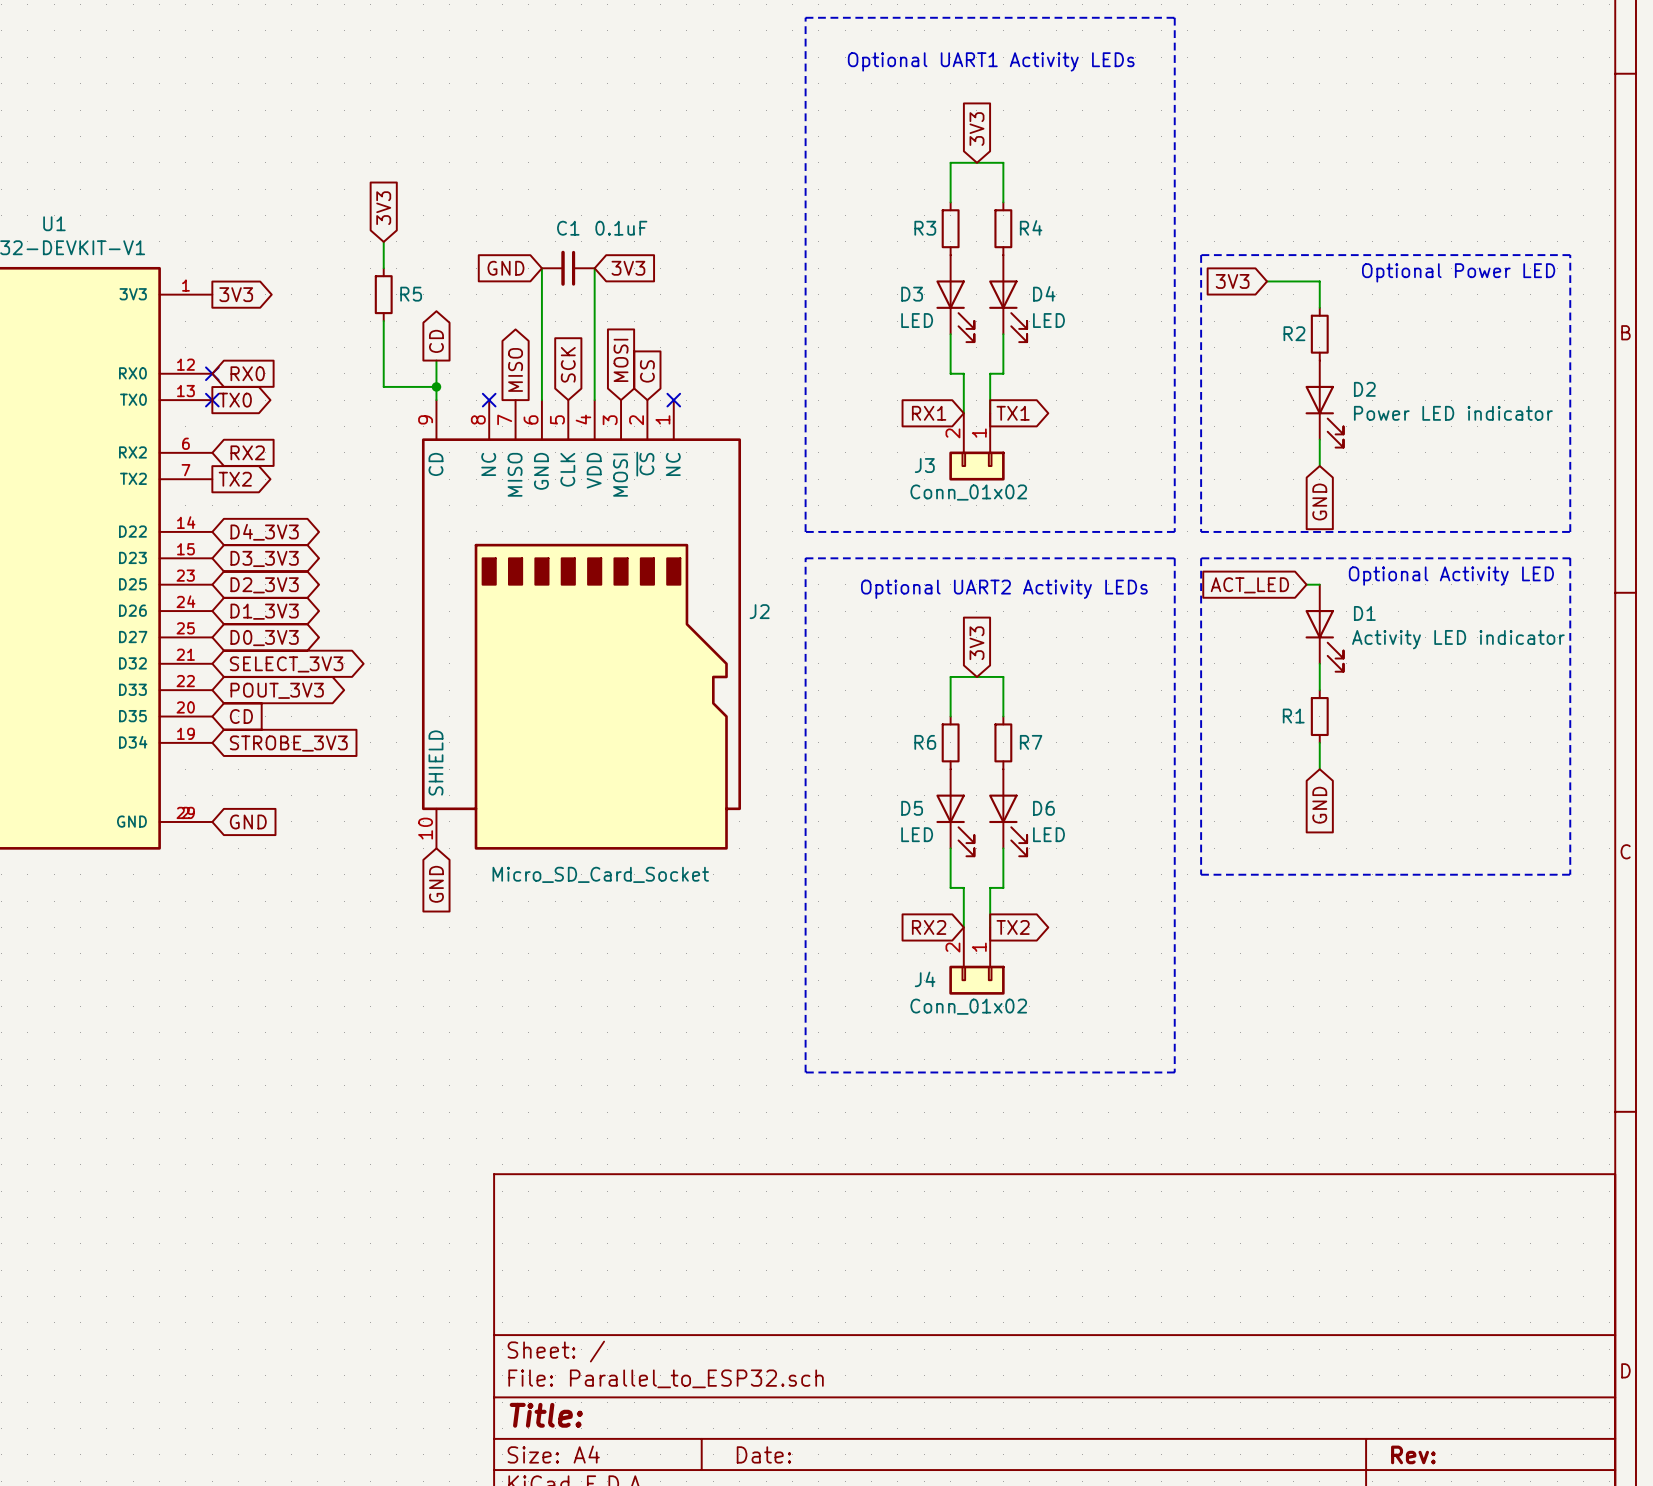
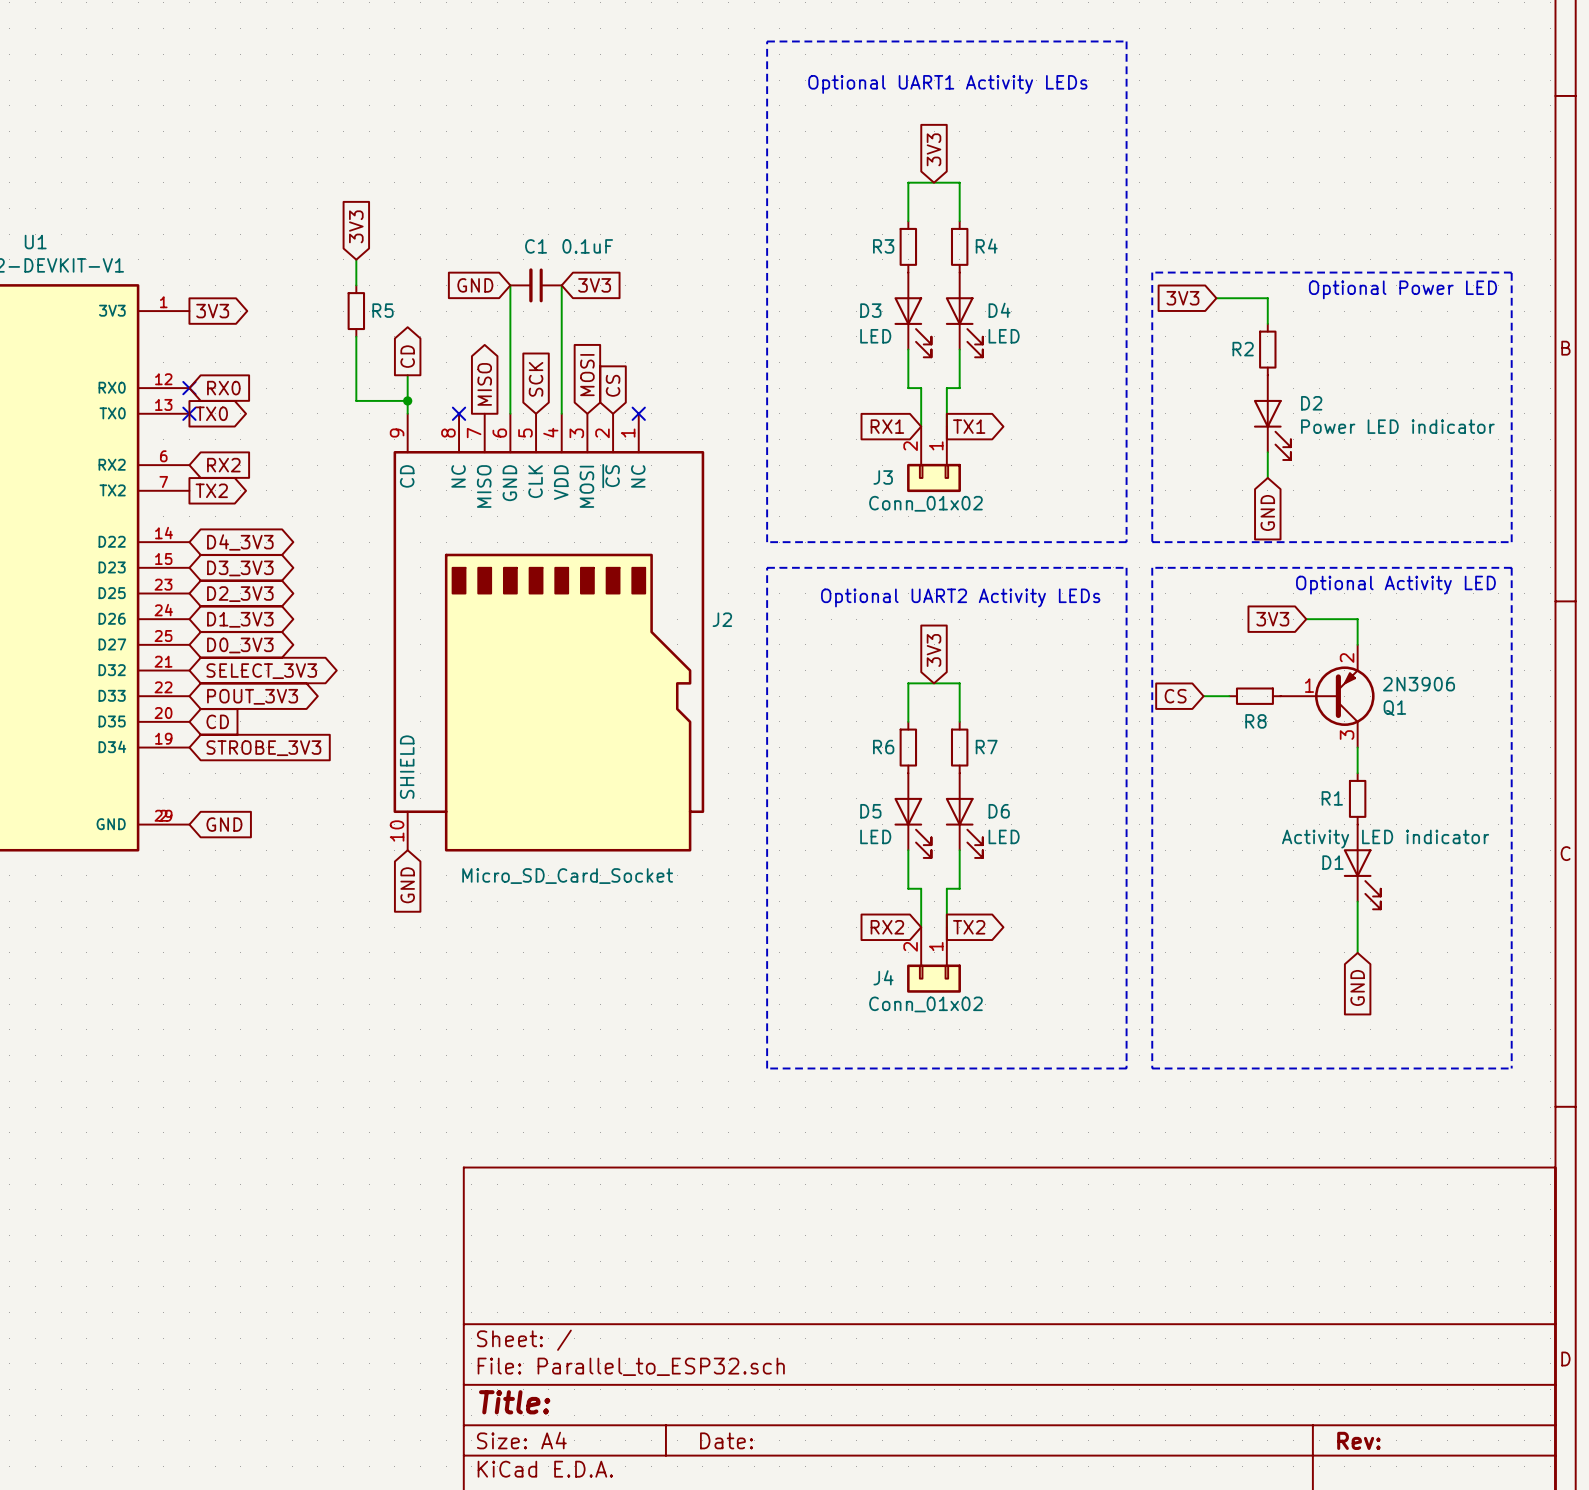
wire: (1306, 584) (1319, 584) -> none
global label: ACT_LED (1249, 585) -> none
global label: none -> 3V3 (1272, 619)
wire: none -> (1306, 619) (1357, 619) (1357, 644)
D1 name position: D1 (1364, 613) -> D1 (1332, 862)
D1 position: (1324, 628) -> (1362, 866)
D1 value position: Activity LED indicator (1458, 639) -> Activity LED indicator (1385, 839)
wire: (1319, 663) (1319, 690) -> none
global label: none -> CS (1175, 696)
wire: none -> (1203, 696) (1229, 696)
R8: none -> (1254, 696)
Q1: none -> 2N3906 (1327, 696)
R1 position: (1319, 716) -> (1357, 798)
wire: (1319, 742) (1319, 769) -> (1357, 747) (1357, 773)
global label position: GND (1319, 805) -> GND (1357, 987)
line: (1201, 874) (1570, 874) -> (1152, 875) (1152, 1068) (1511, 1068) (1511, 875)
wire: none -> (1357, 901) (1357, 952)

